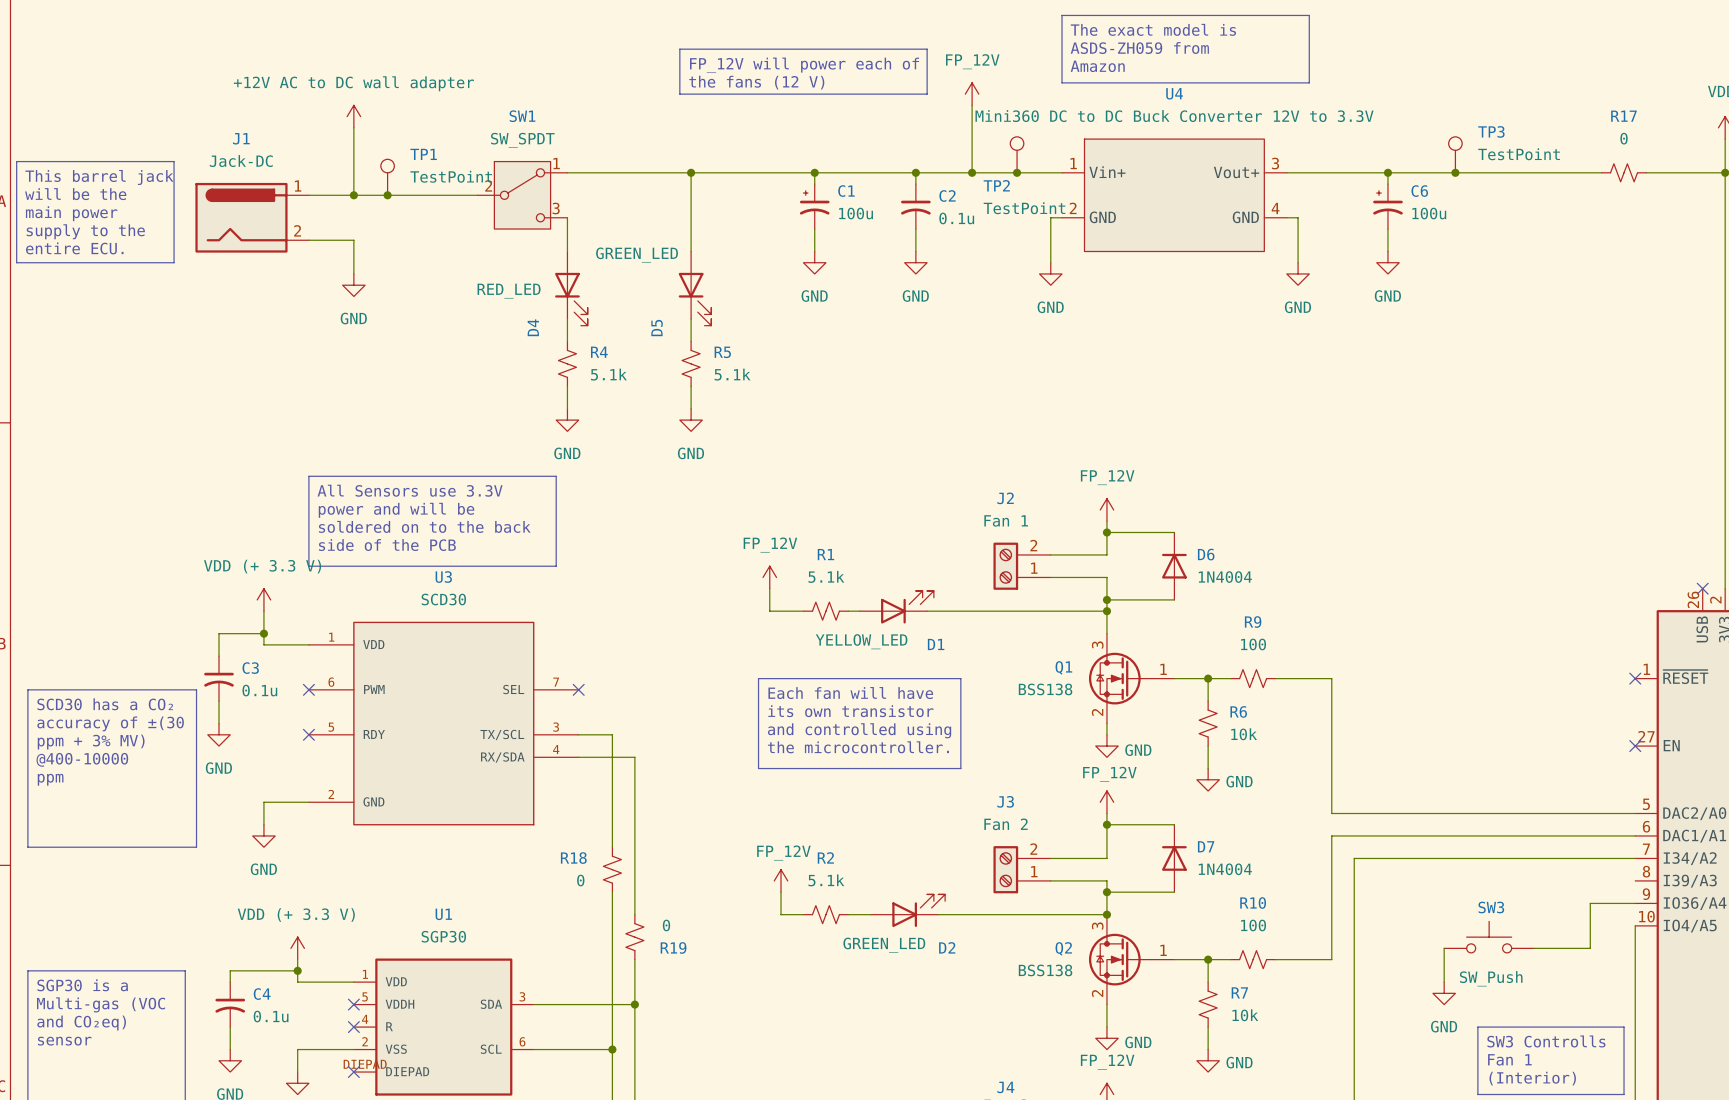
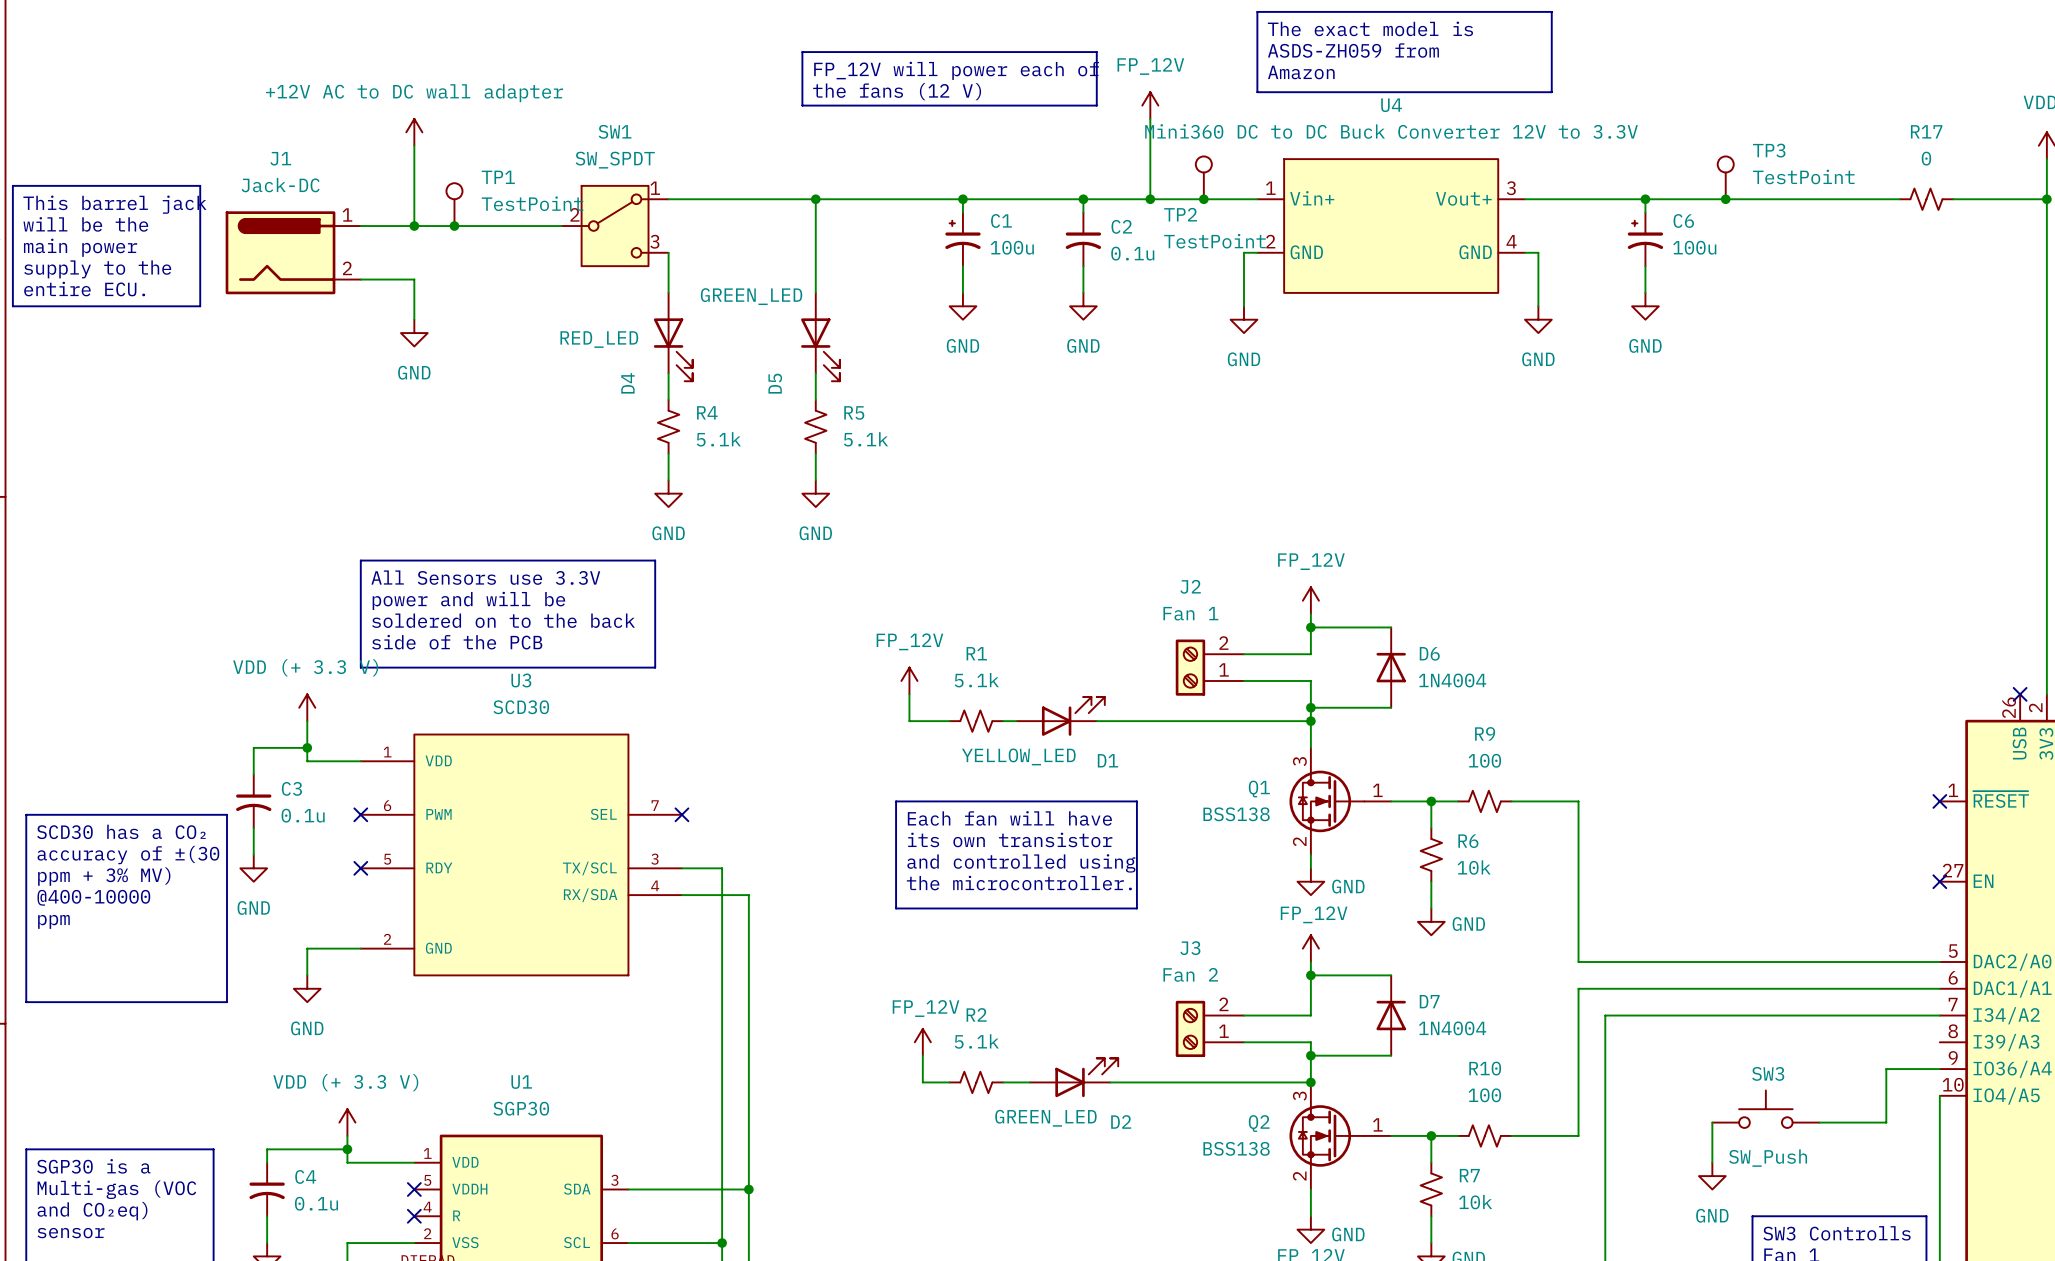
R18: 0 (612, 869) -> none
R19: 0 (634, 937) -> none

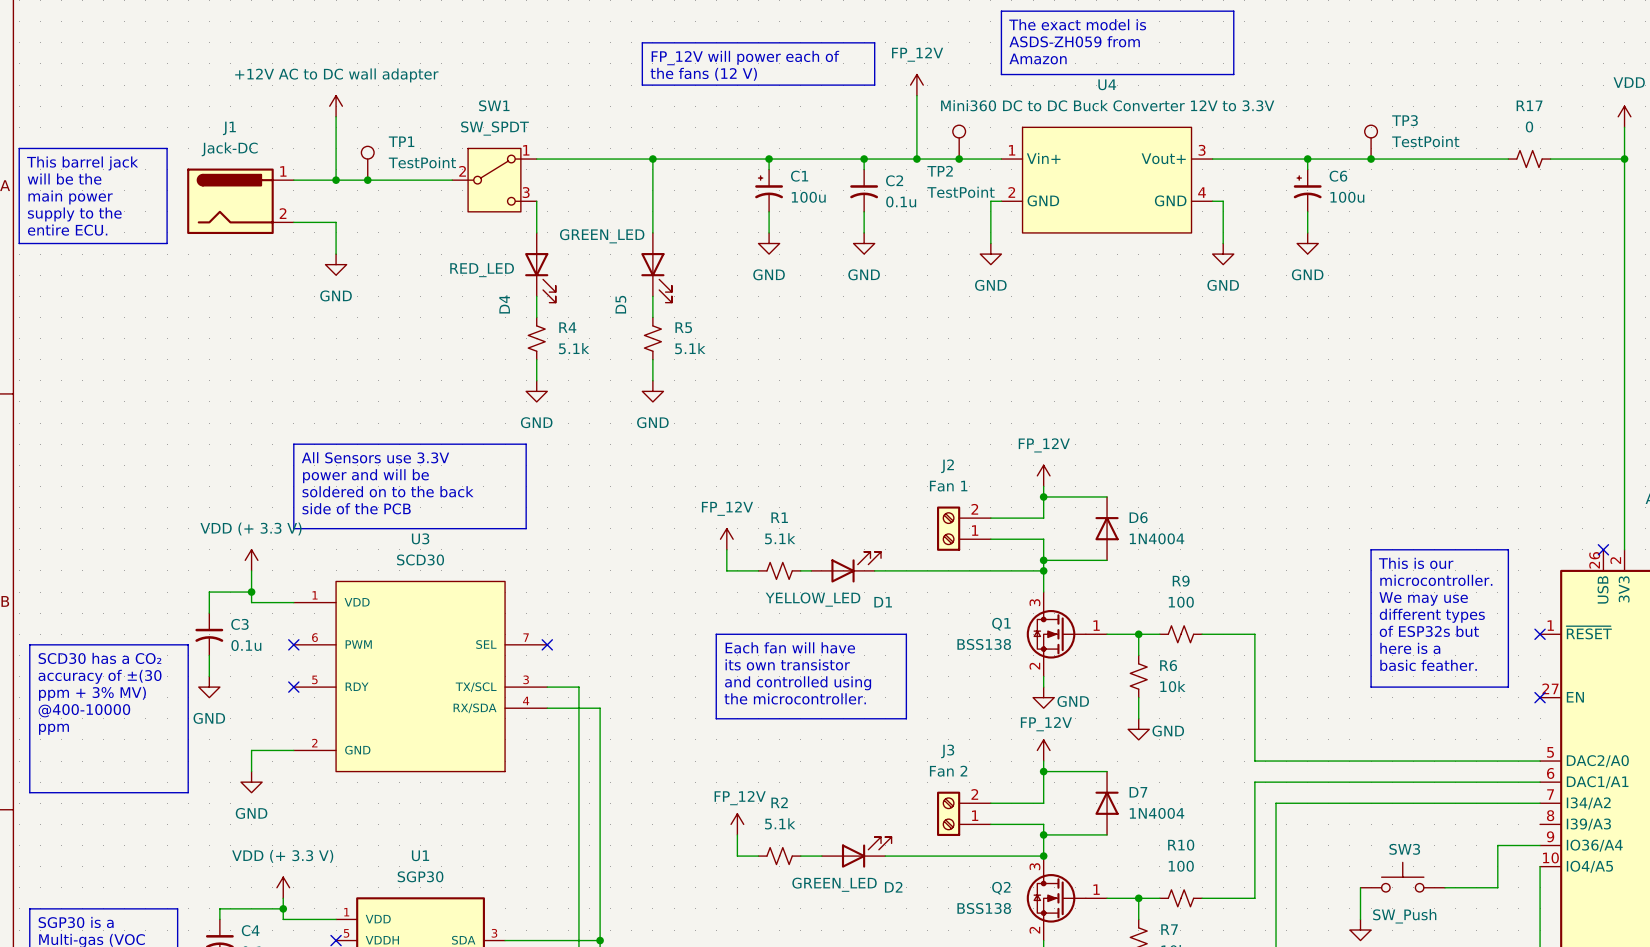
line: none -> (1371, 549) (1508, 549) (1508, 687) (1371, 687) (1371, 549)
text: none -> This is our (1416, 563)
text: none -> microcontroller. (1436, 580)
text: none -> We may use (1423, 599)
text: none -> different types (1432, 615)
text: none -> of ESP32s but (1429, 631)
text: none -> here is a (1410, 648)
text: none -> basic feather. (1428, 665)

